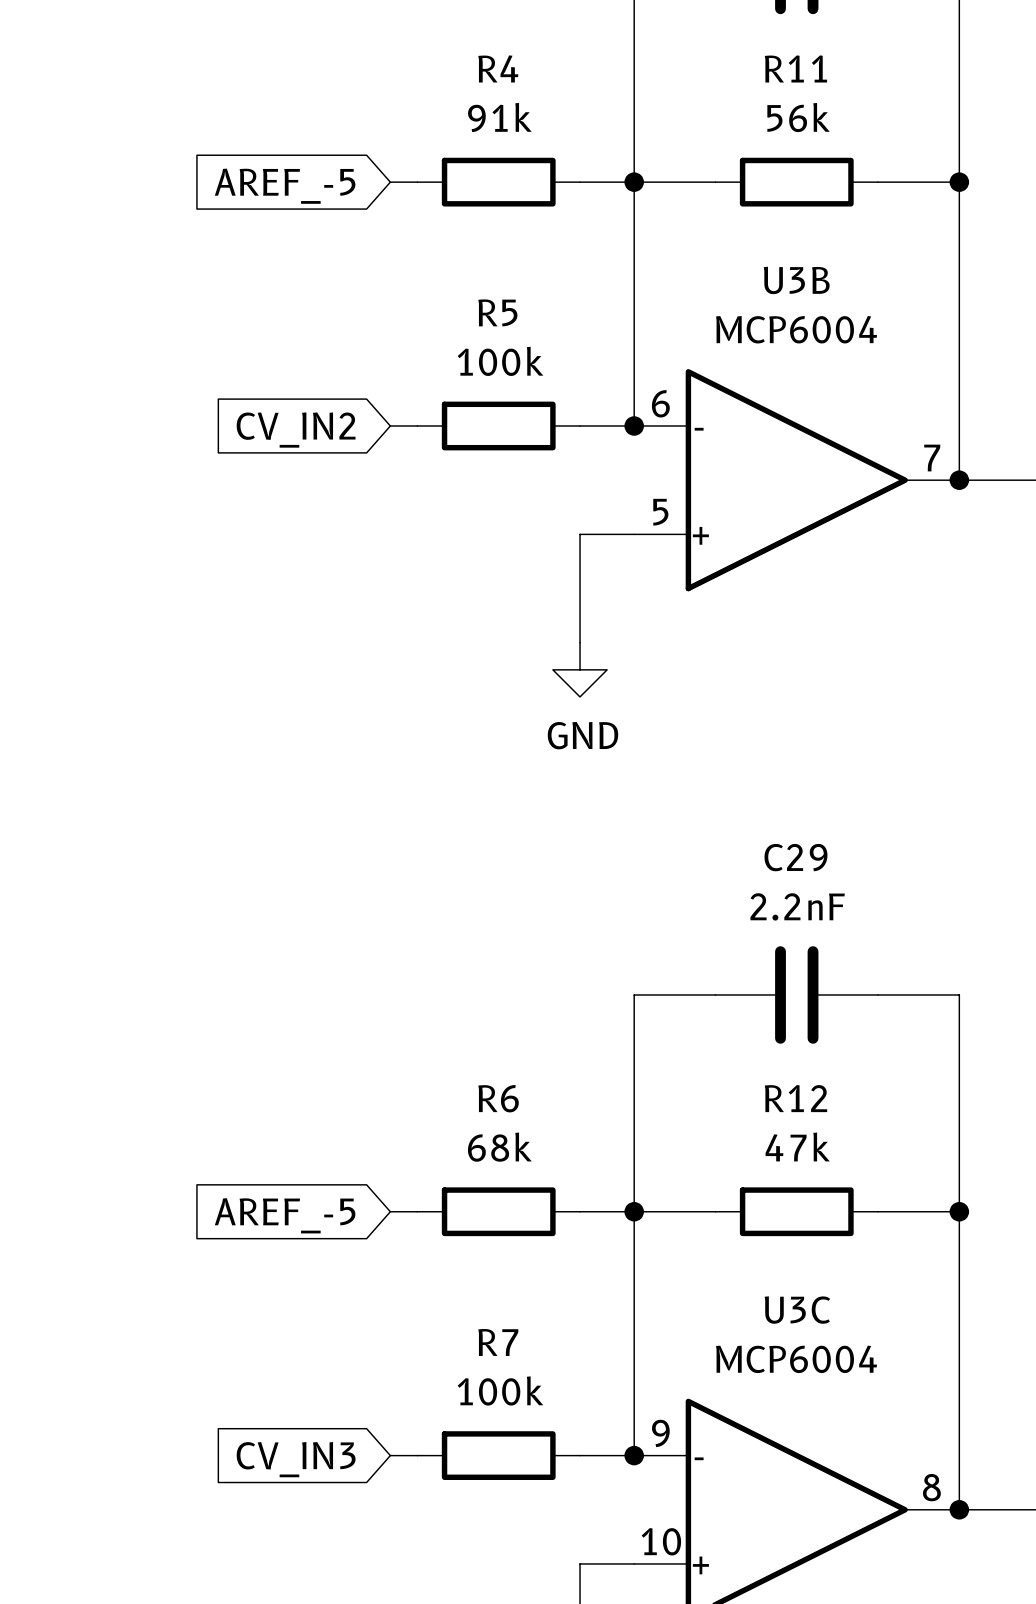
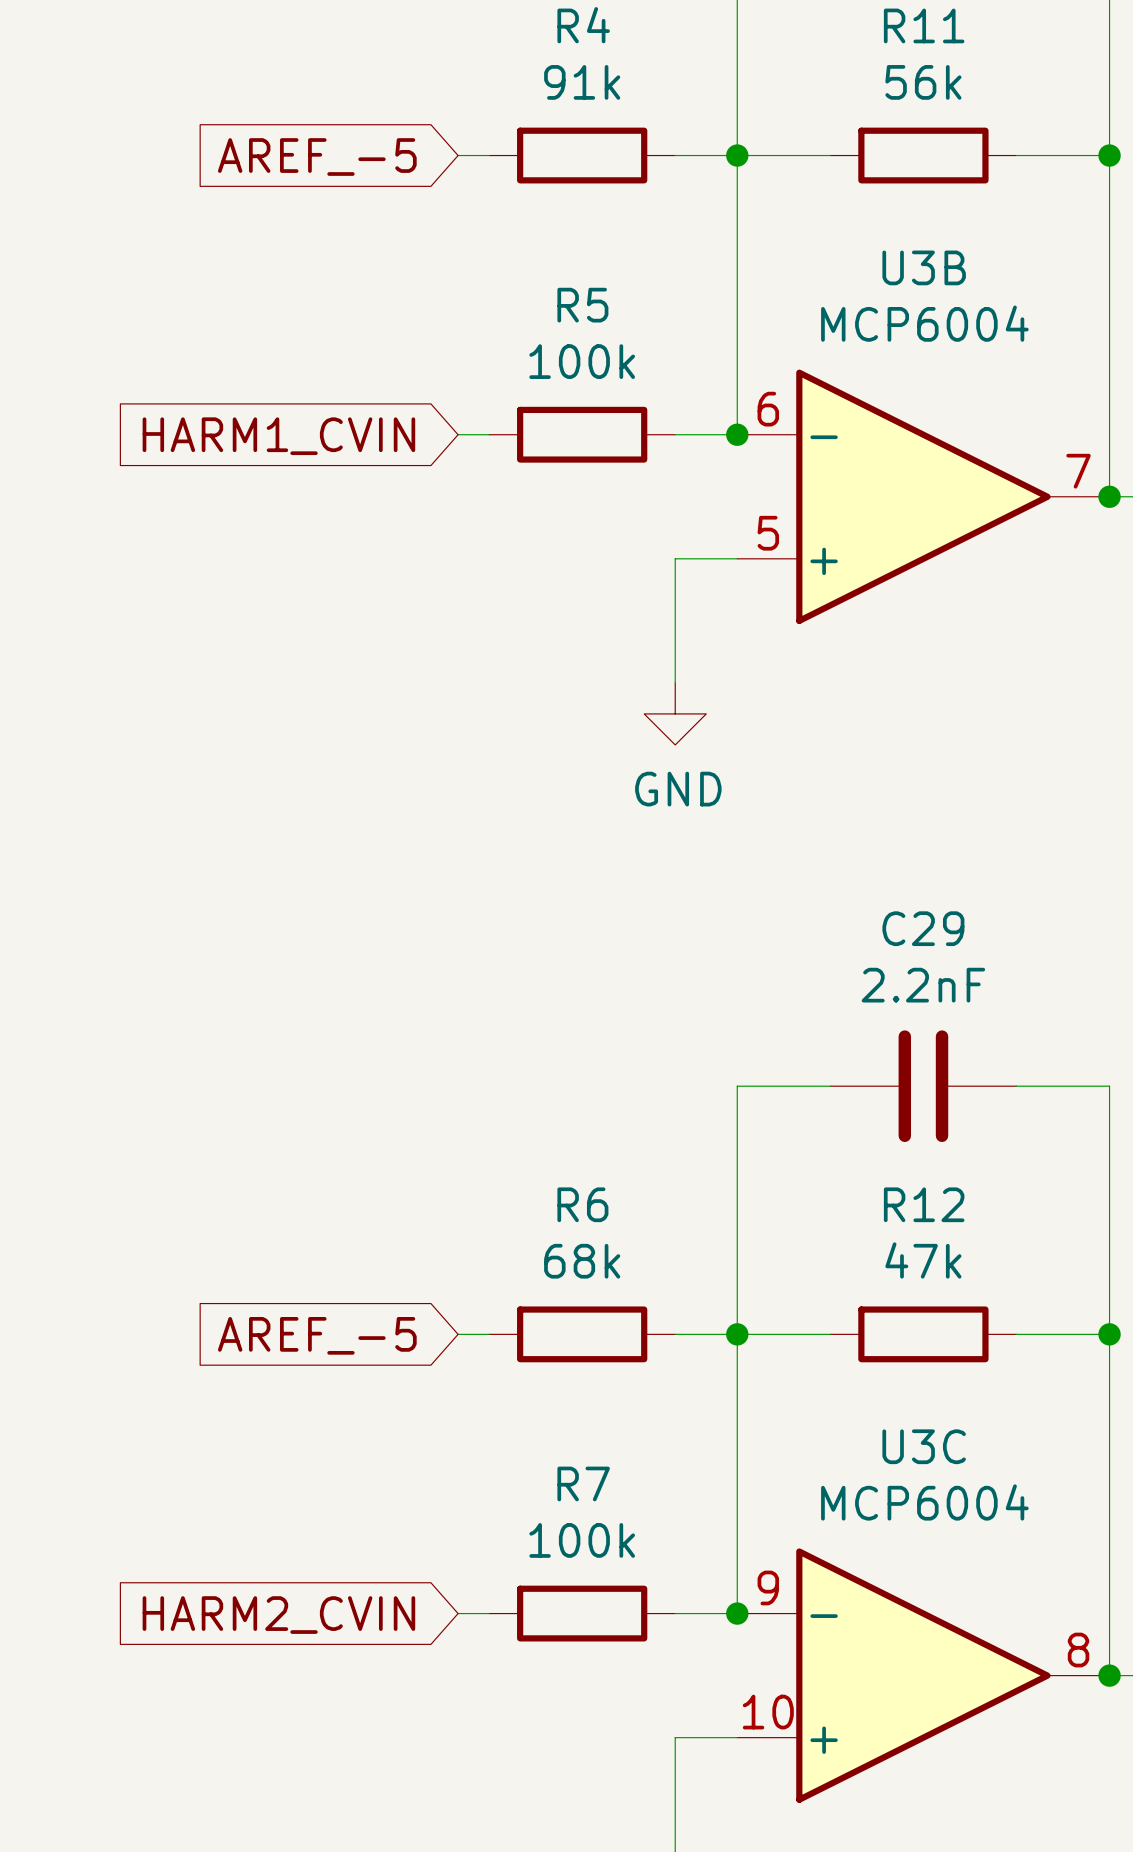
global label: CV_IN2 (296, 430) -> HARM1_CVIN (278, 436)
global label: CV_IN3 (296, 1459) -> HARM2_CVIN (278, 1615)

